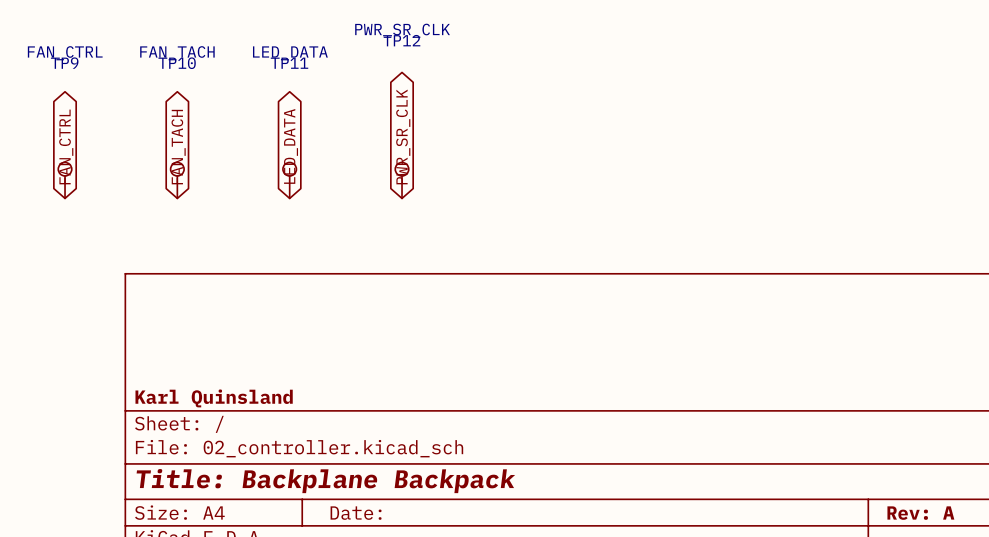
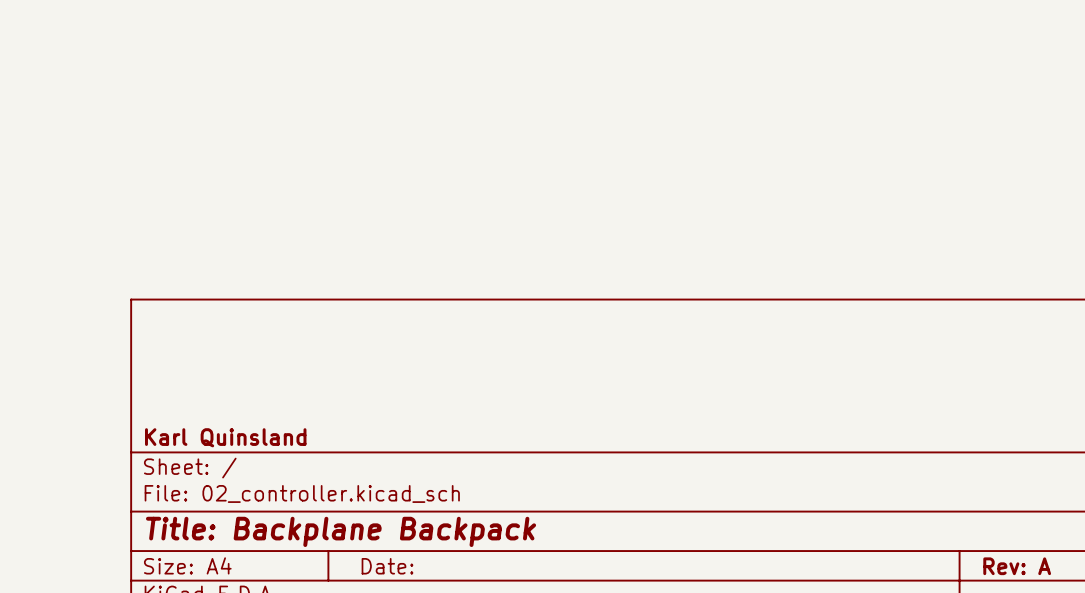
global label: PWR_SR_CLK (403, 136) -> none
global label: FAN_CTRL (66, 146) -> none
global label: LED_DATA (291, 146) -> none
global label: FAN_TACH (178, 147) -> none
TP9: FAN_CTRL (65, 180) -> none
TP10: FAN_TACH (177, 180) -> none
TP11: LED_DATA (289, 180) -> none
TP12: PWR_SR_CLK (402, 180) -> none

